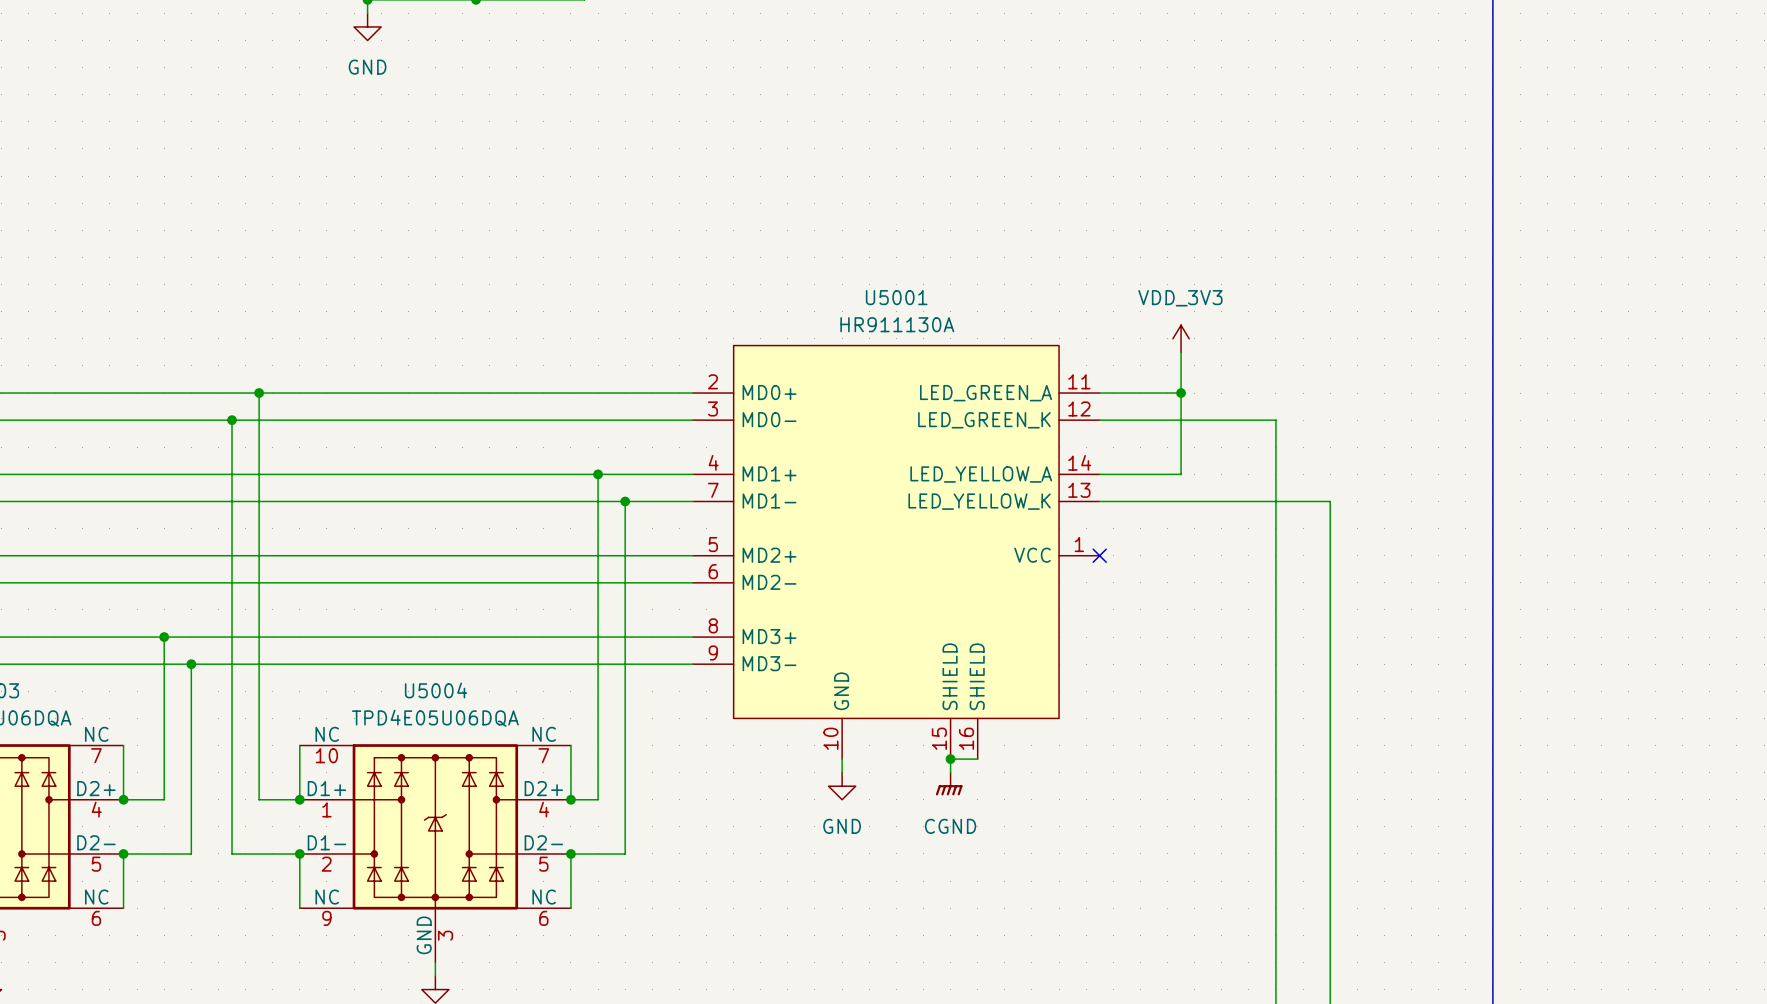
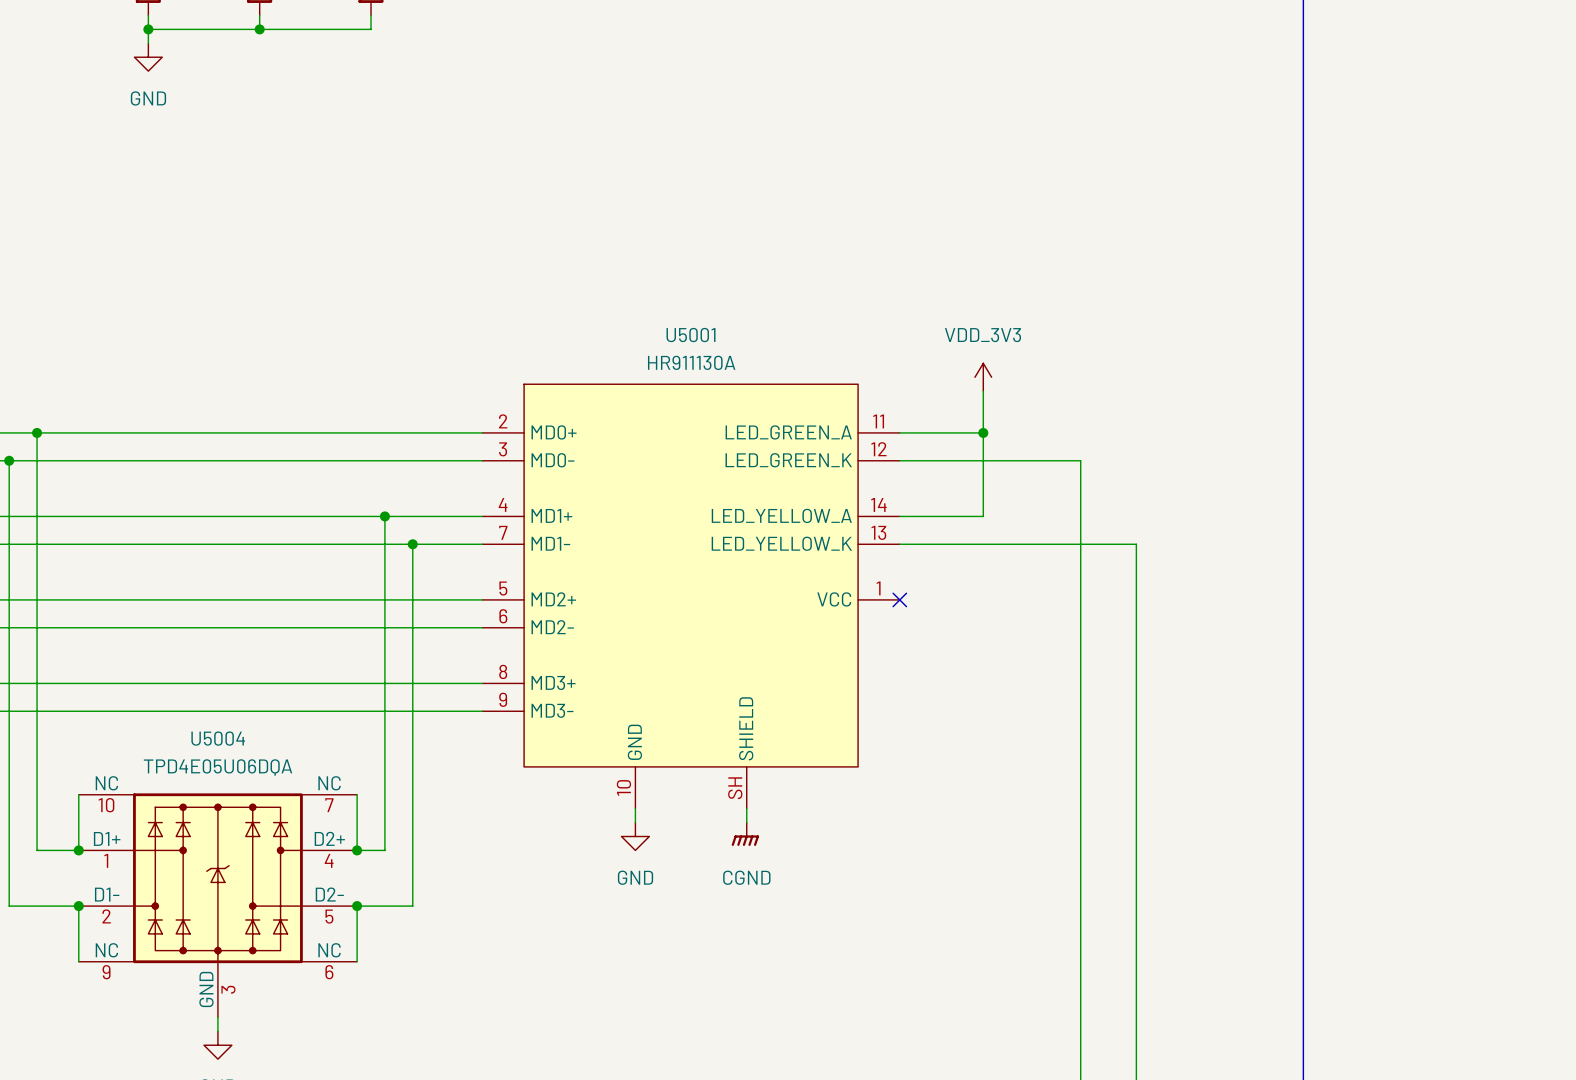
U5001 symbol: [692, 345, 1100, 760] -> [482, 384, 900, 809]
wire: (950, 759) (977, 759) -> none
junction: (950, 759) -> none

